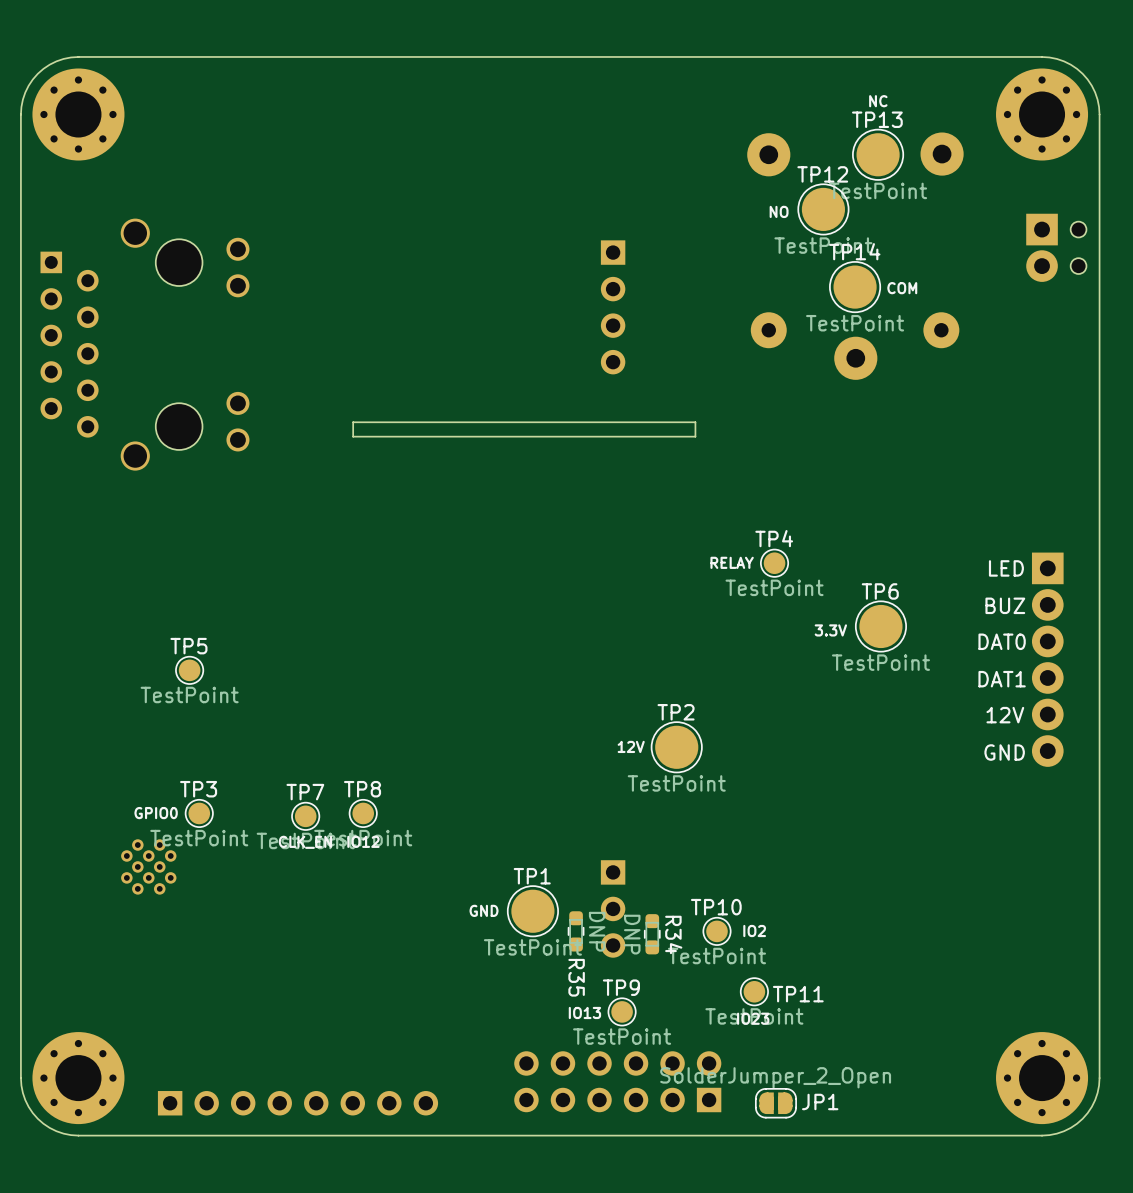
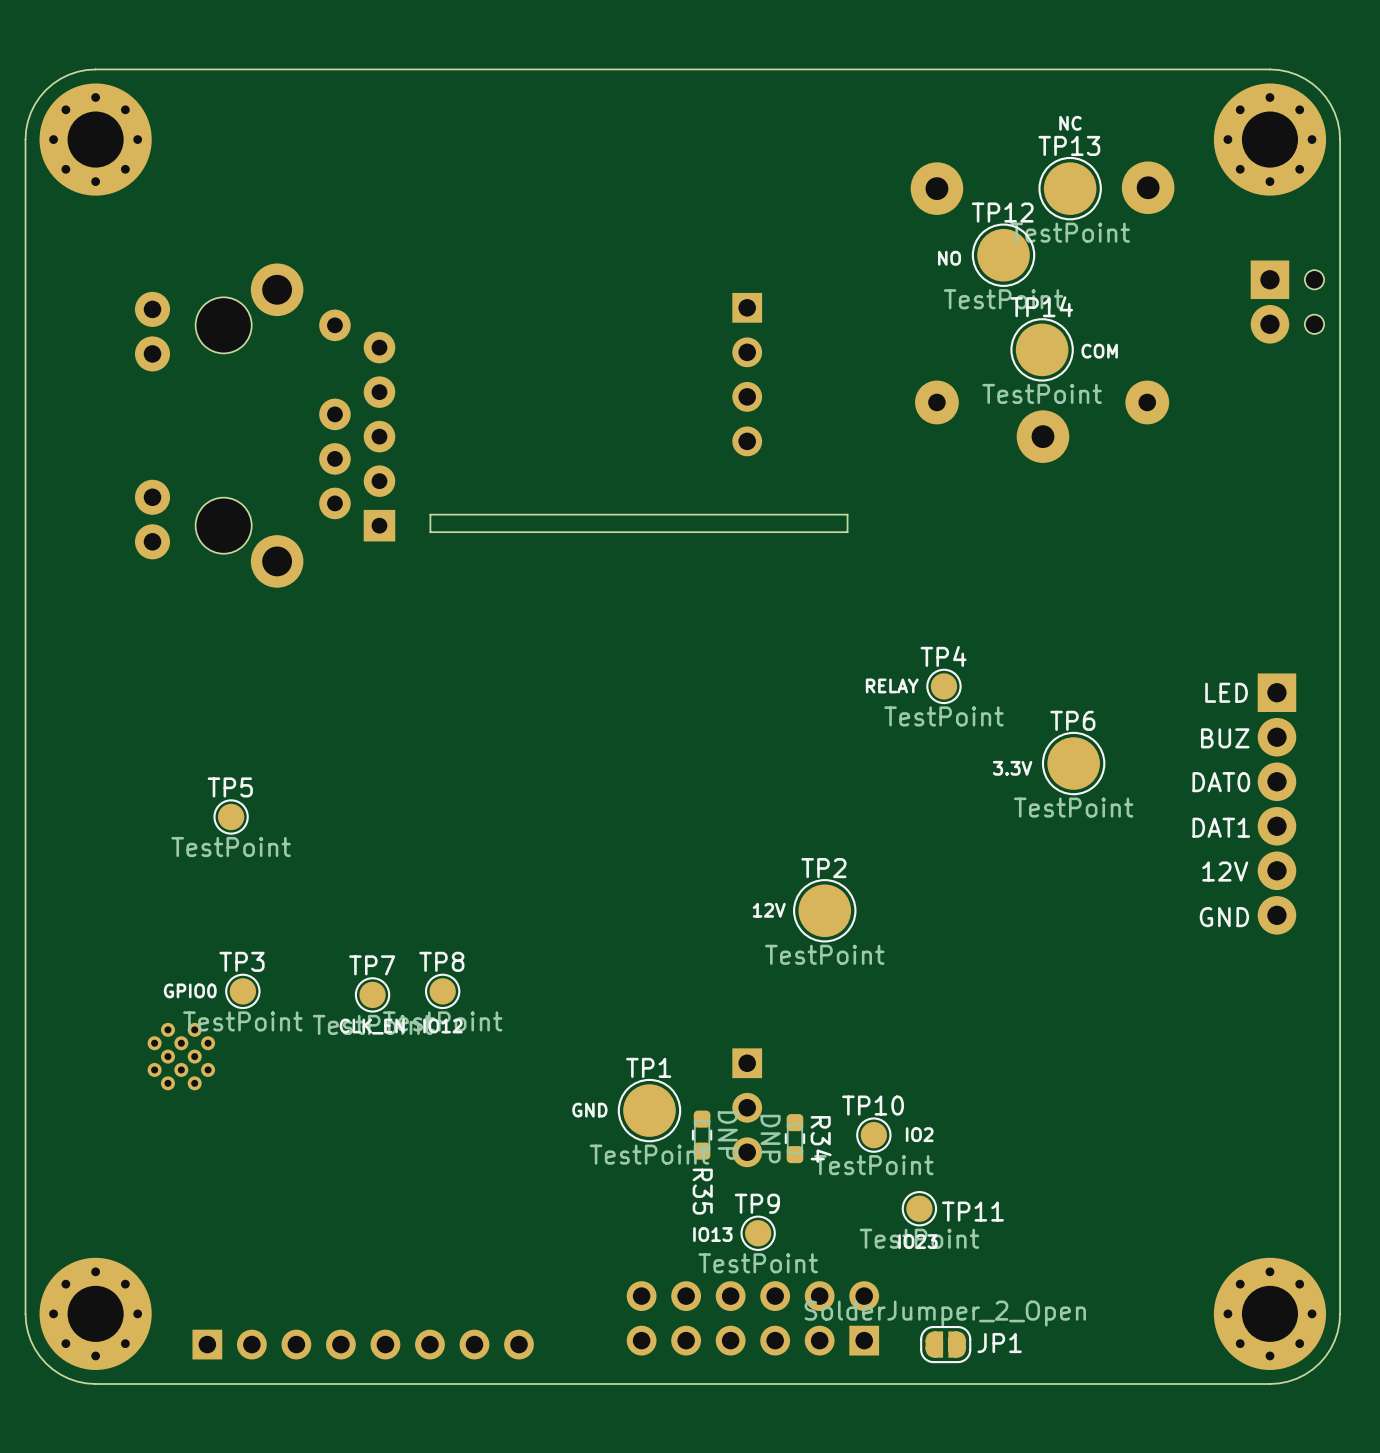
part: (144, 344) -> none
part: none -> (265, 425)

